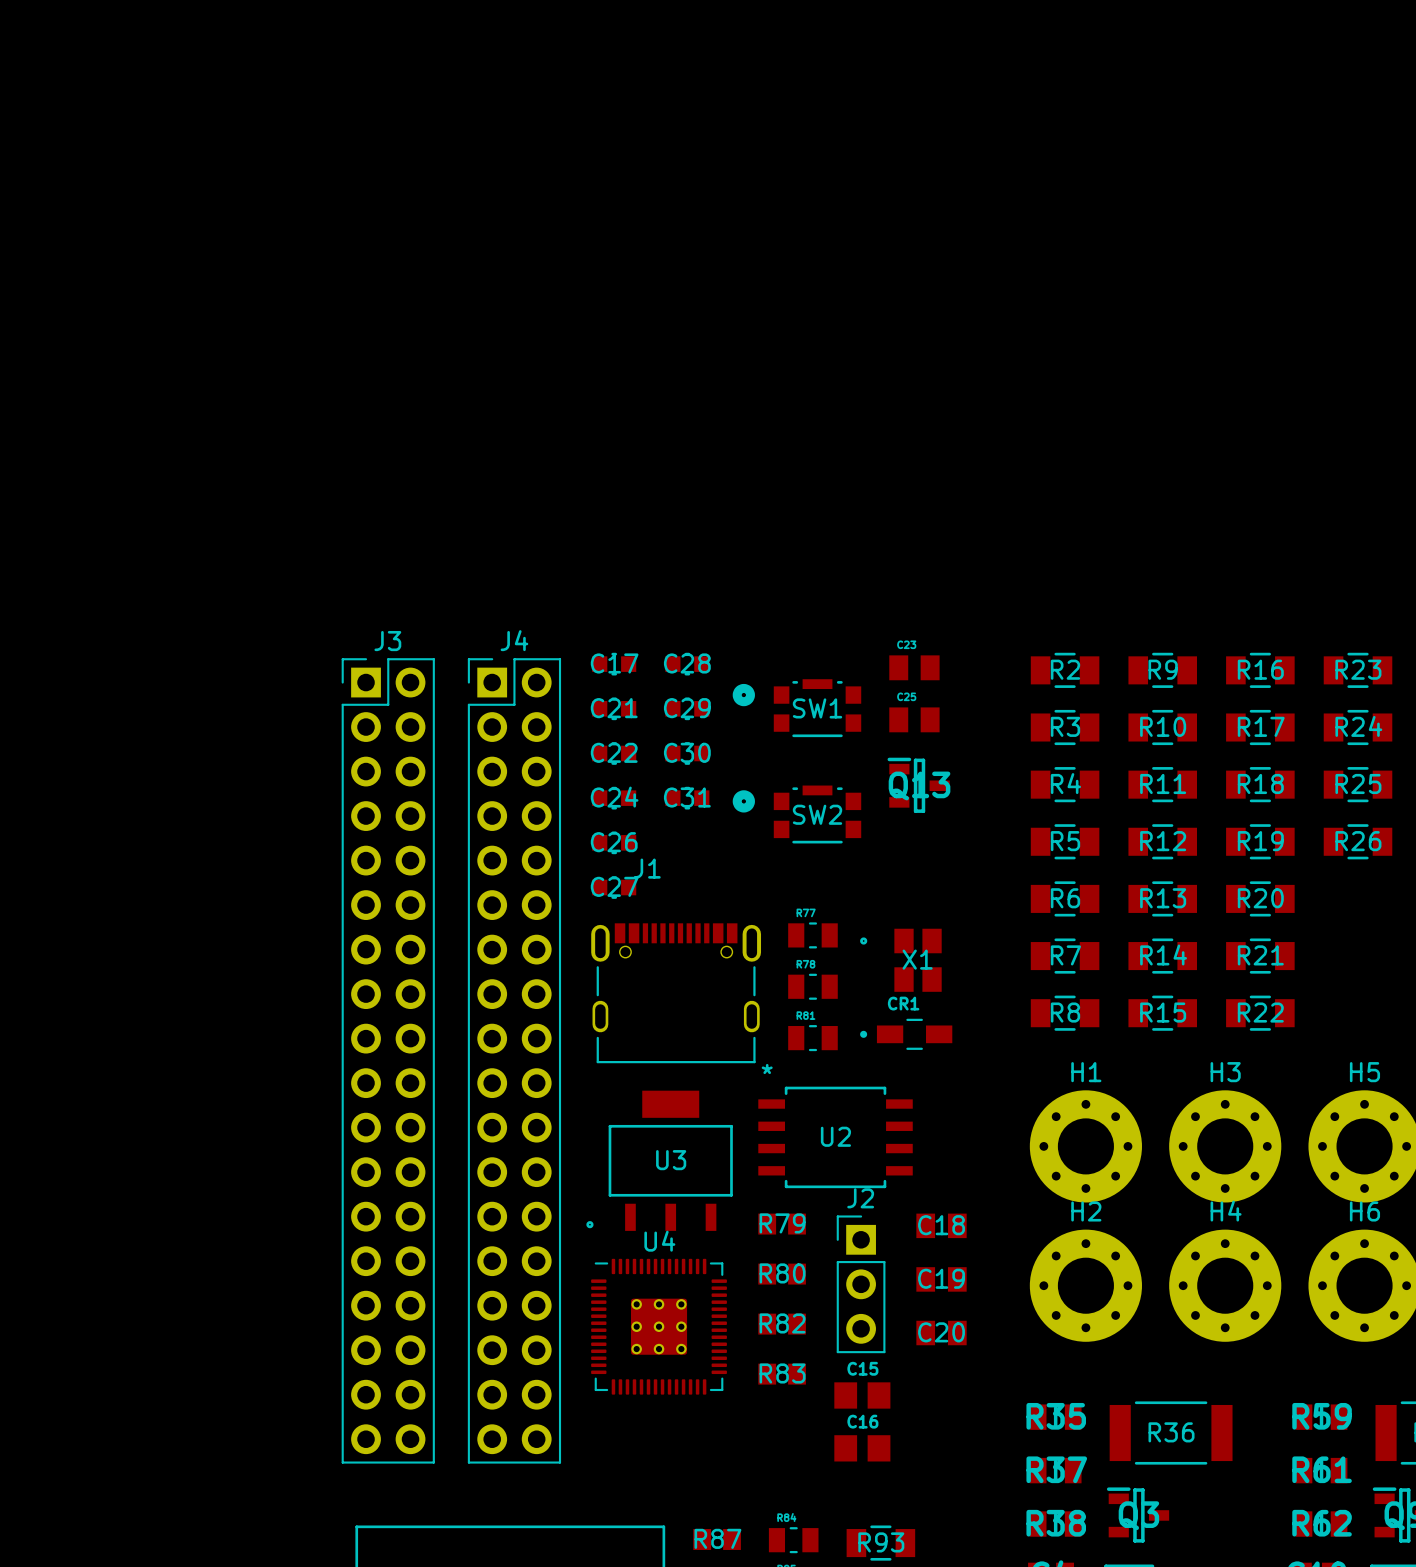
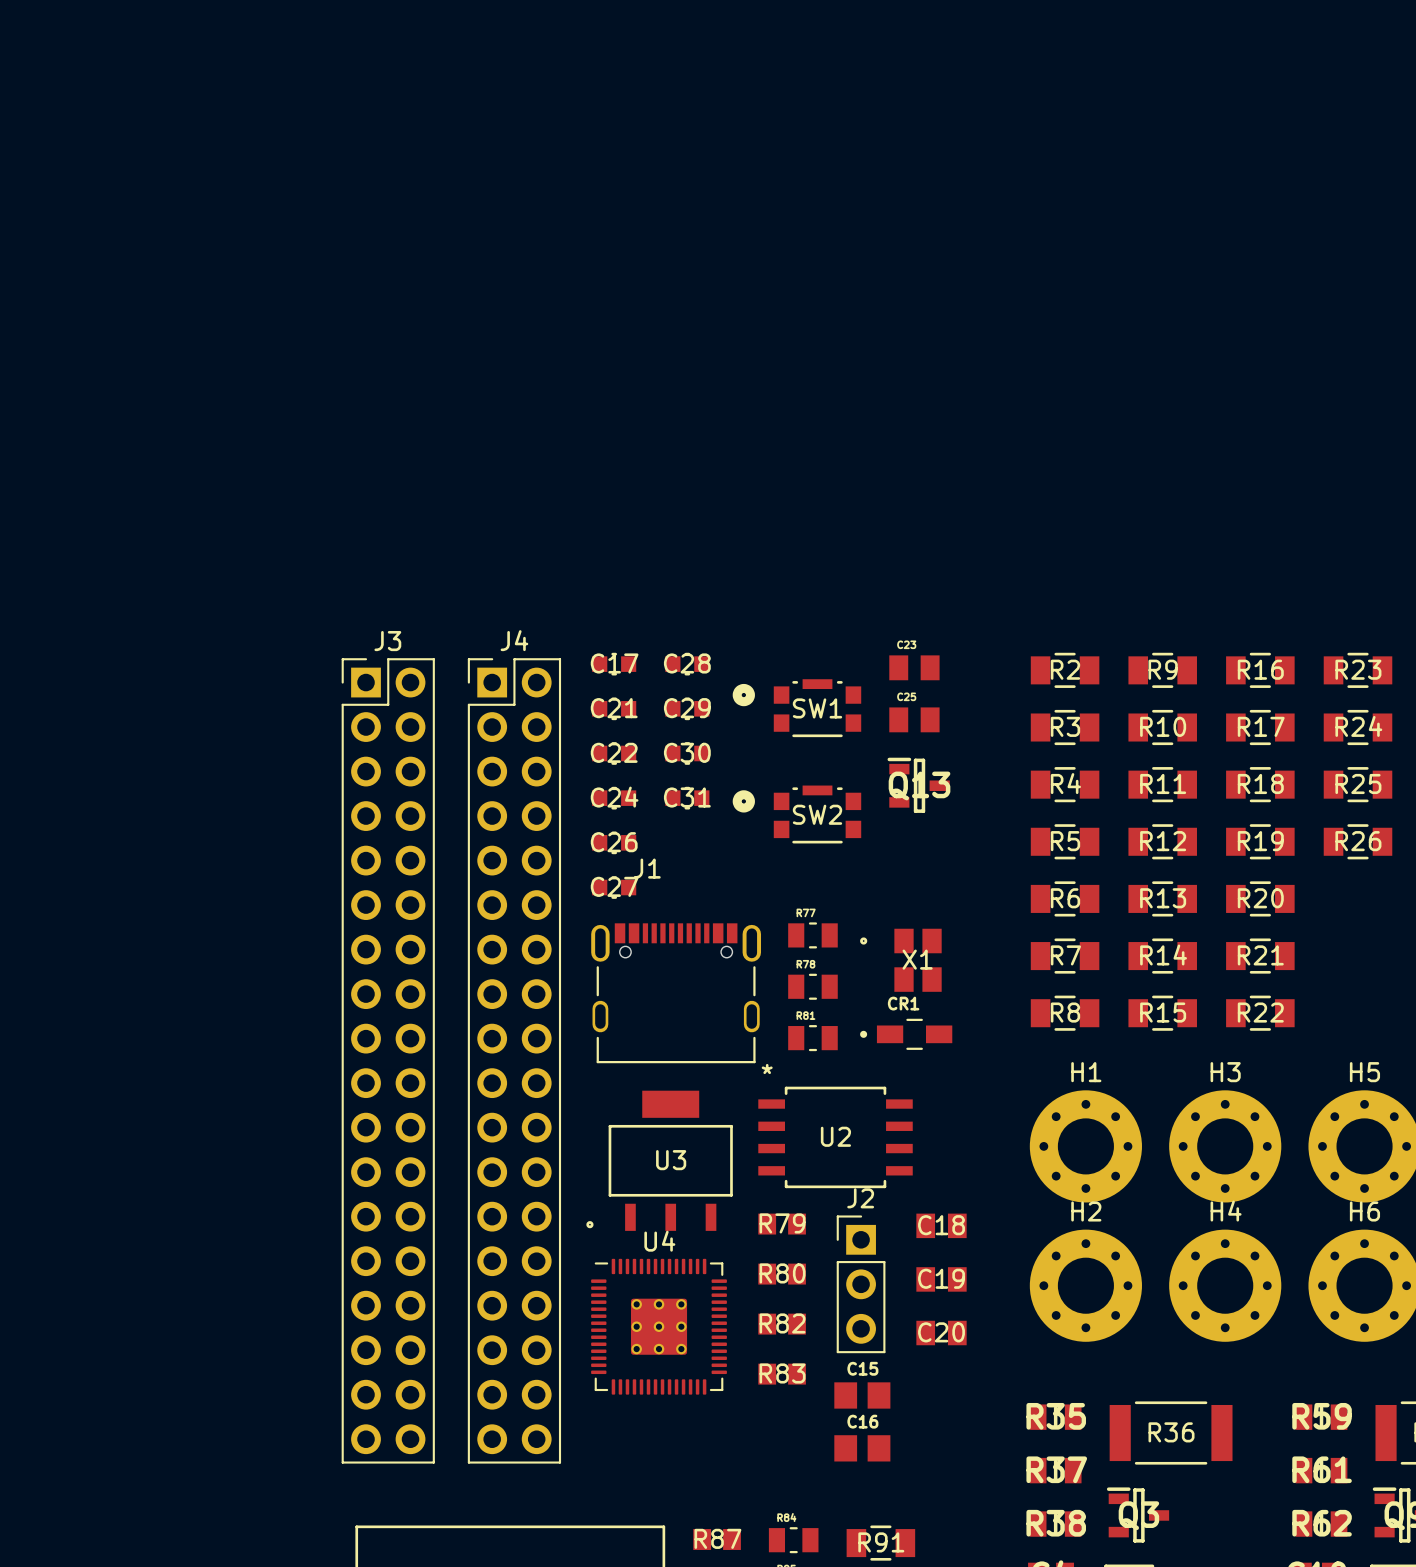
R93 name: R93 (881, 1542) -> R91 (881, 1542)

